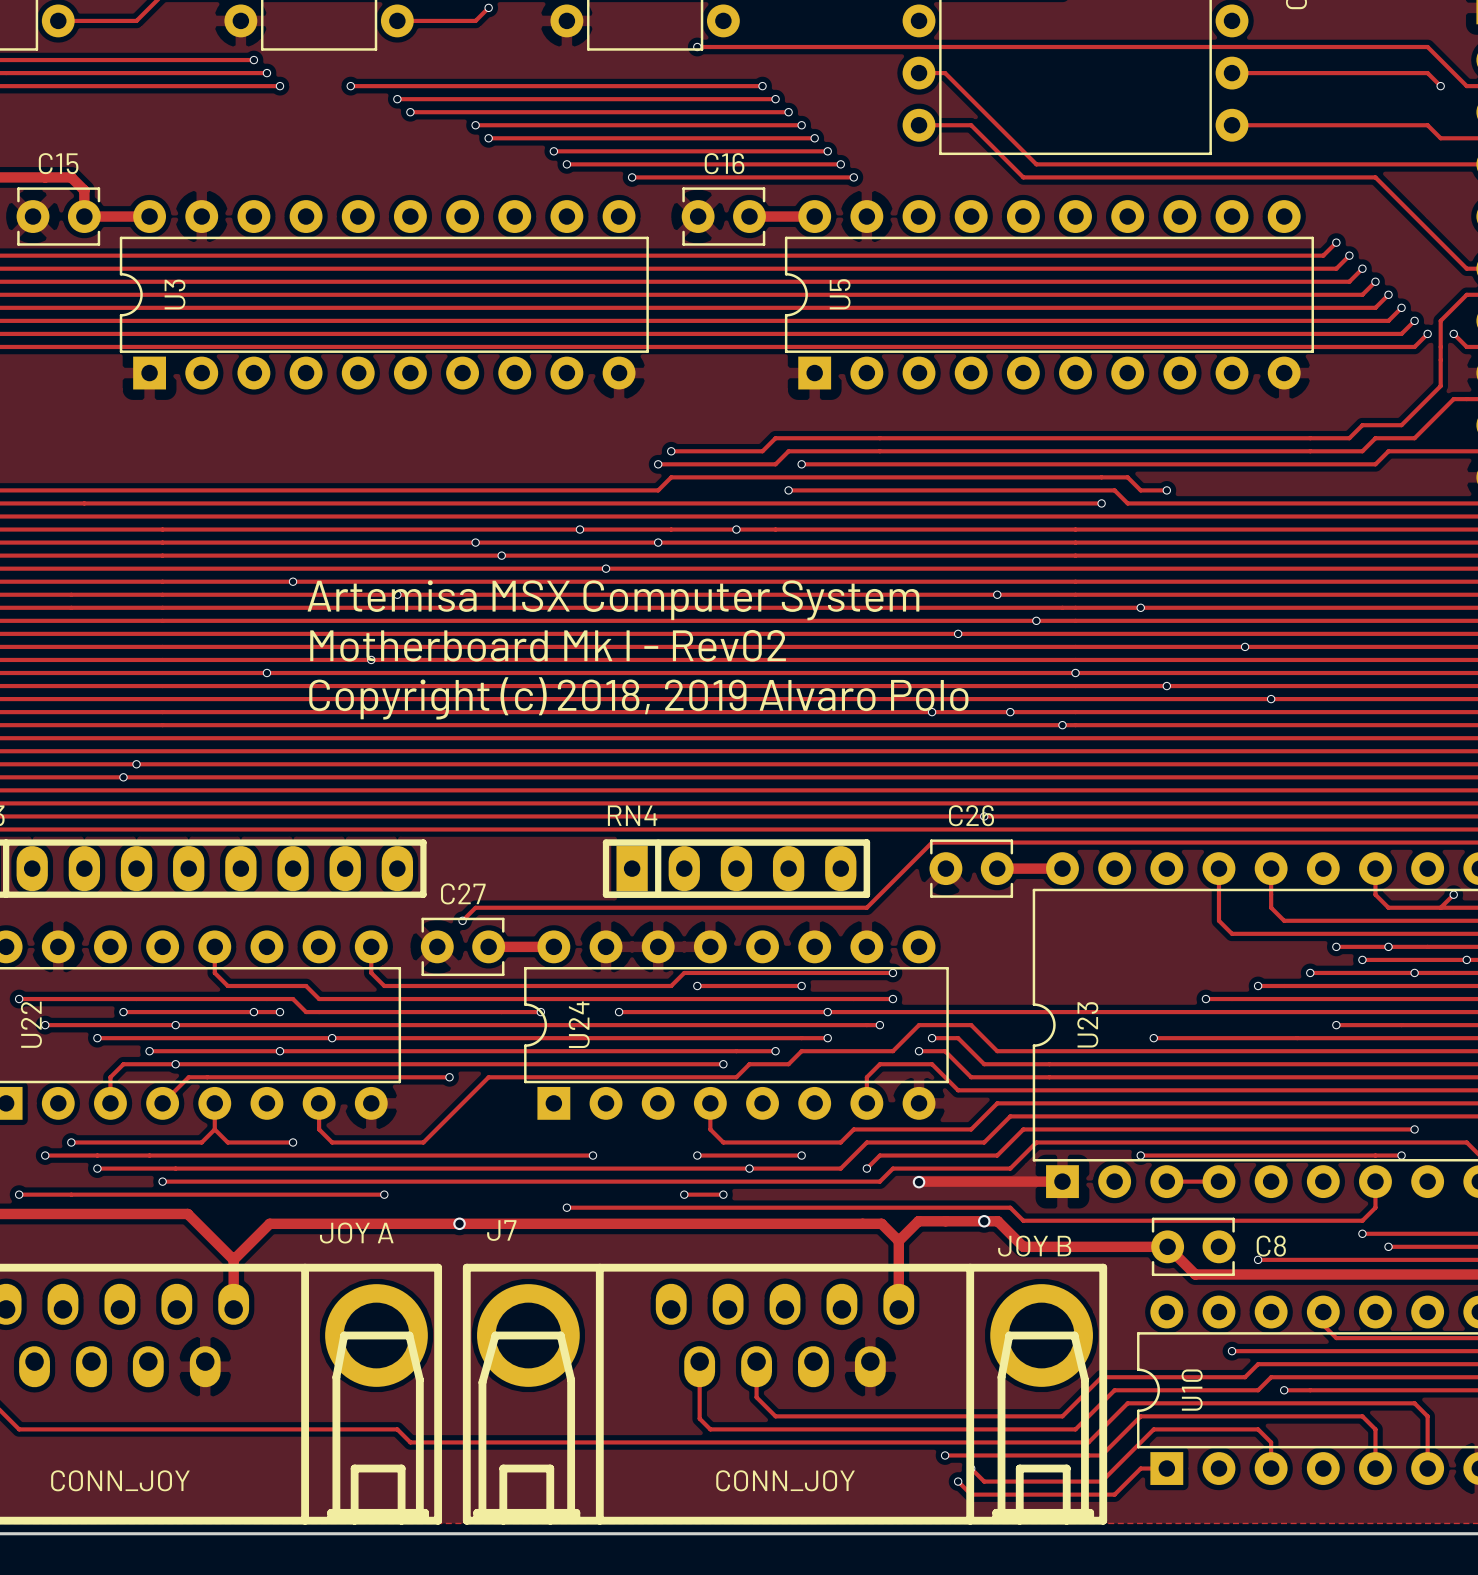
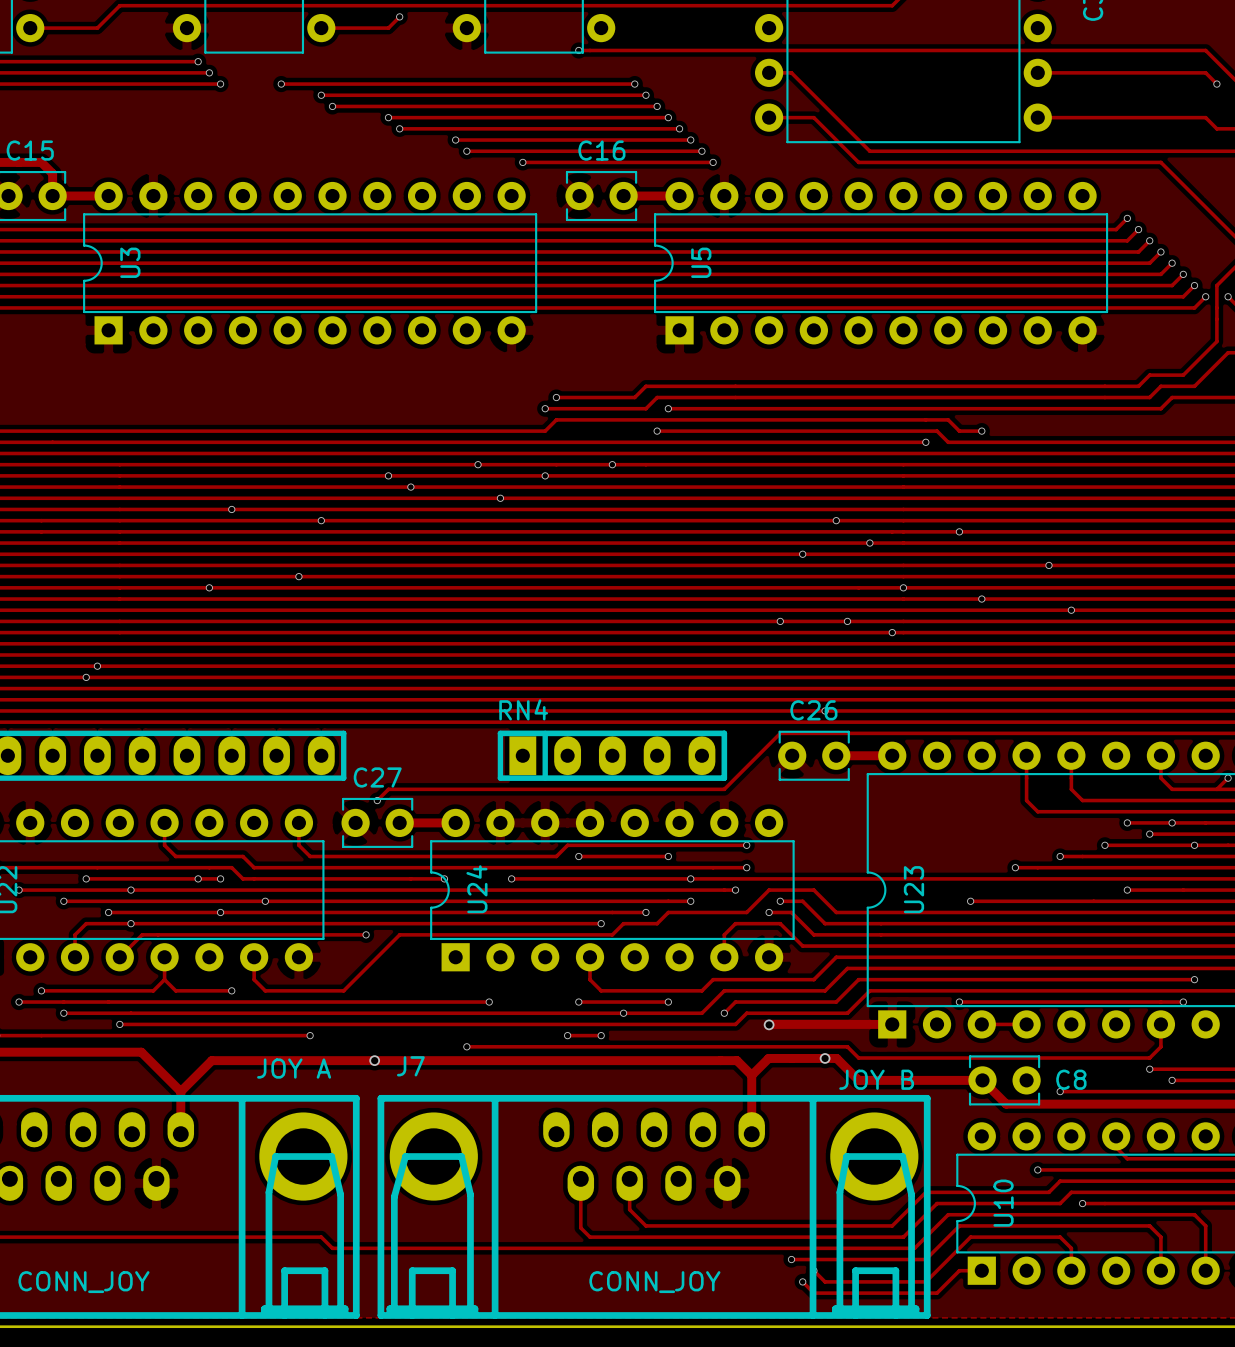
text: Artemisa MSX Computer System (613, 600) -> none
text: Motherboard Mk I - Rev02 (548, 645) -> none
text: Copyright (c) 2018, 2019 Alvaro Polo (638, 698) -> none

